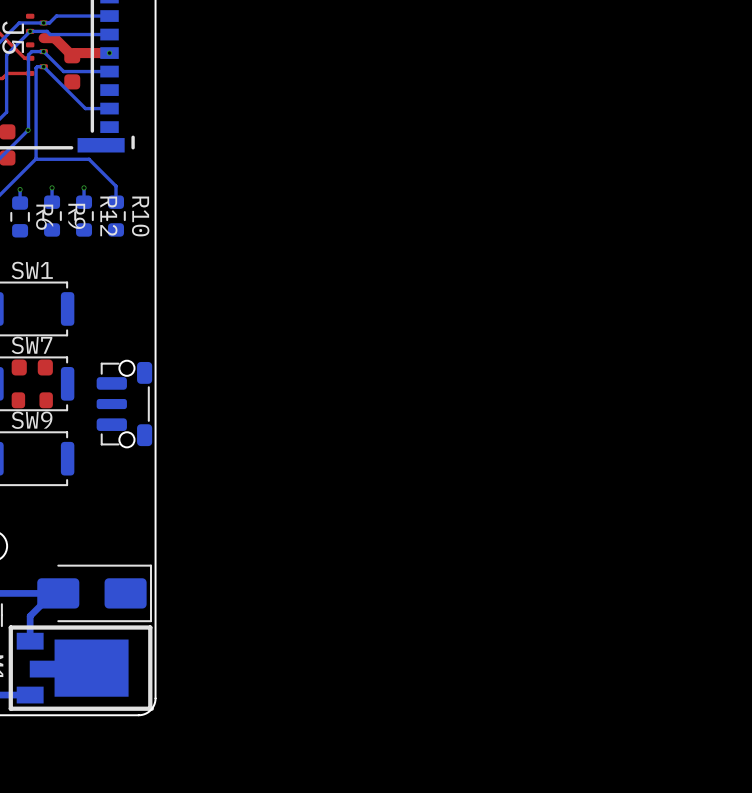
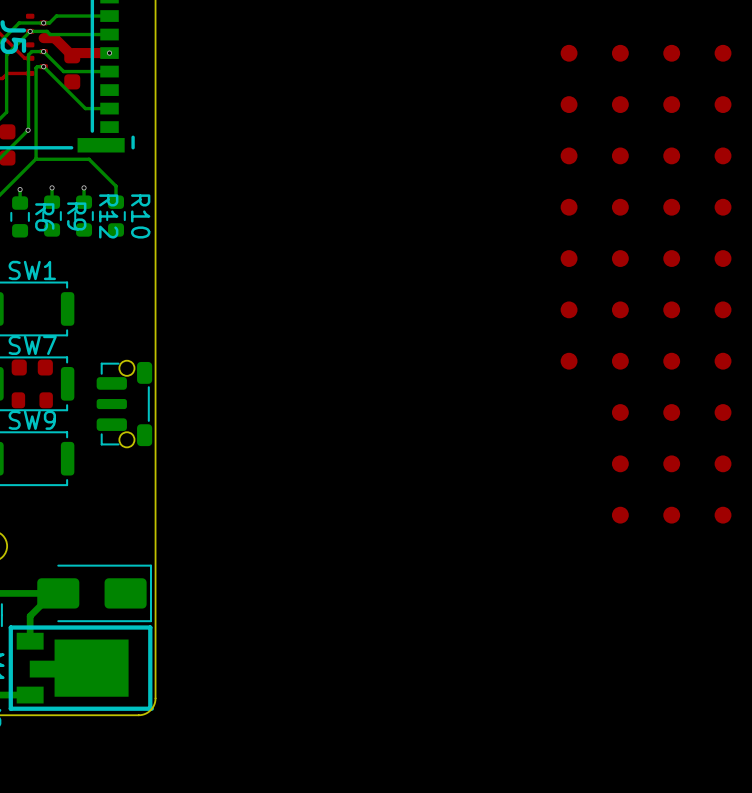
part: none -> (569, 53)
part: none -> (620, 53)
part: none -> (671, 53)
part: none -> (723, 53)
part: none -> (569, 104)
part: none -> (620, 104)
part: none -> (671, 104)
part: none -> (723, 104)
part: none -> (569, 155)
part: none -> (620, 155)
part: none -> (671, 155)
part: none -> (723, 155)
part: none -> (569, 207)
part: none -> (620, 207)
part: none -> (671, 207)
part: none -> (723, 207)
part: none -> (569, 258)
part: none -> (620, 258)
part: none -> (671, 258)
part: none -> (723, 258)
part: none -> (569, 309)
part: none -> (620, 309)
part: none -> (671, 309)
part: none -> (723, 309)
part: none -> (569, 361)
part: none -> (620, 361)
part: none -> (671, 361)
part: none -> (723, 361)
part: none -> (620, 412)
part: none -> (671, 412)
part: none -> (723, 412)
part: none -> (620, 463)
part: none -> (671, 463)
part: none -> (723, 463)
part: none -> (620, 515)
part: none -> (671, 515)
part: none -> (723, 515)

